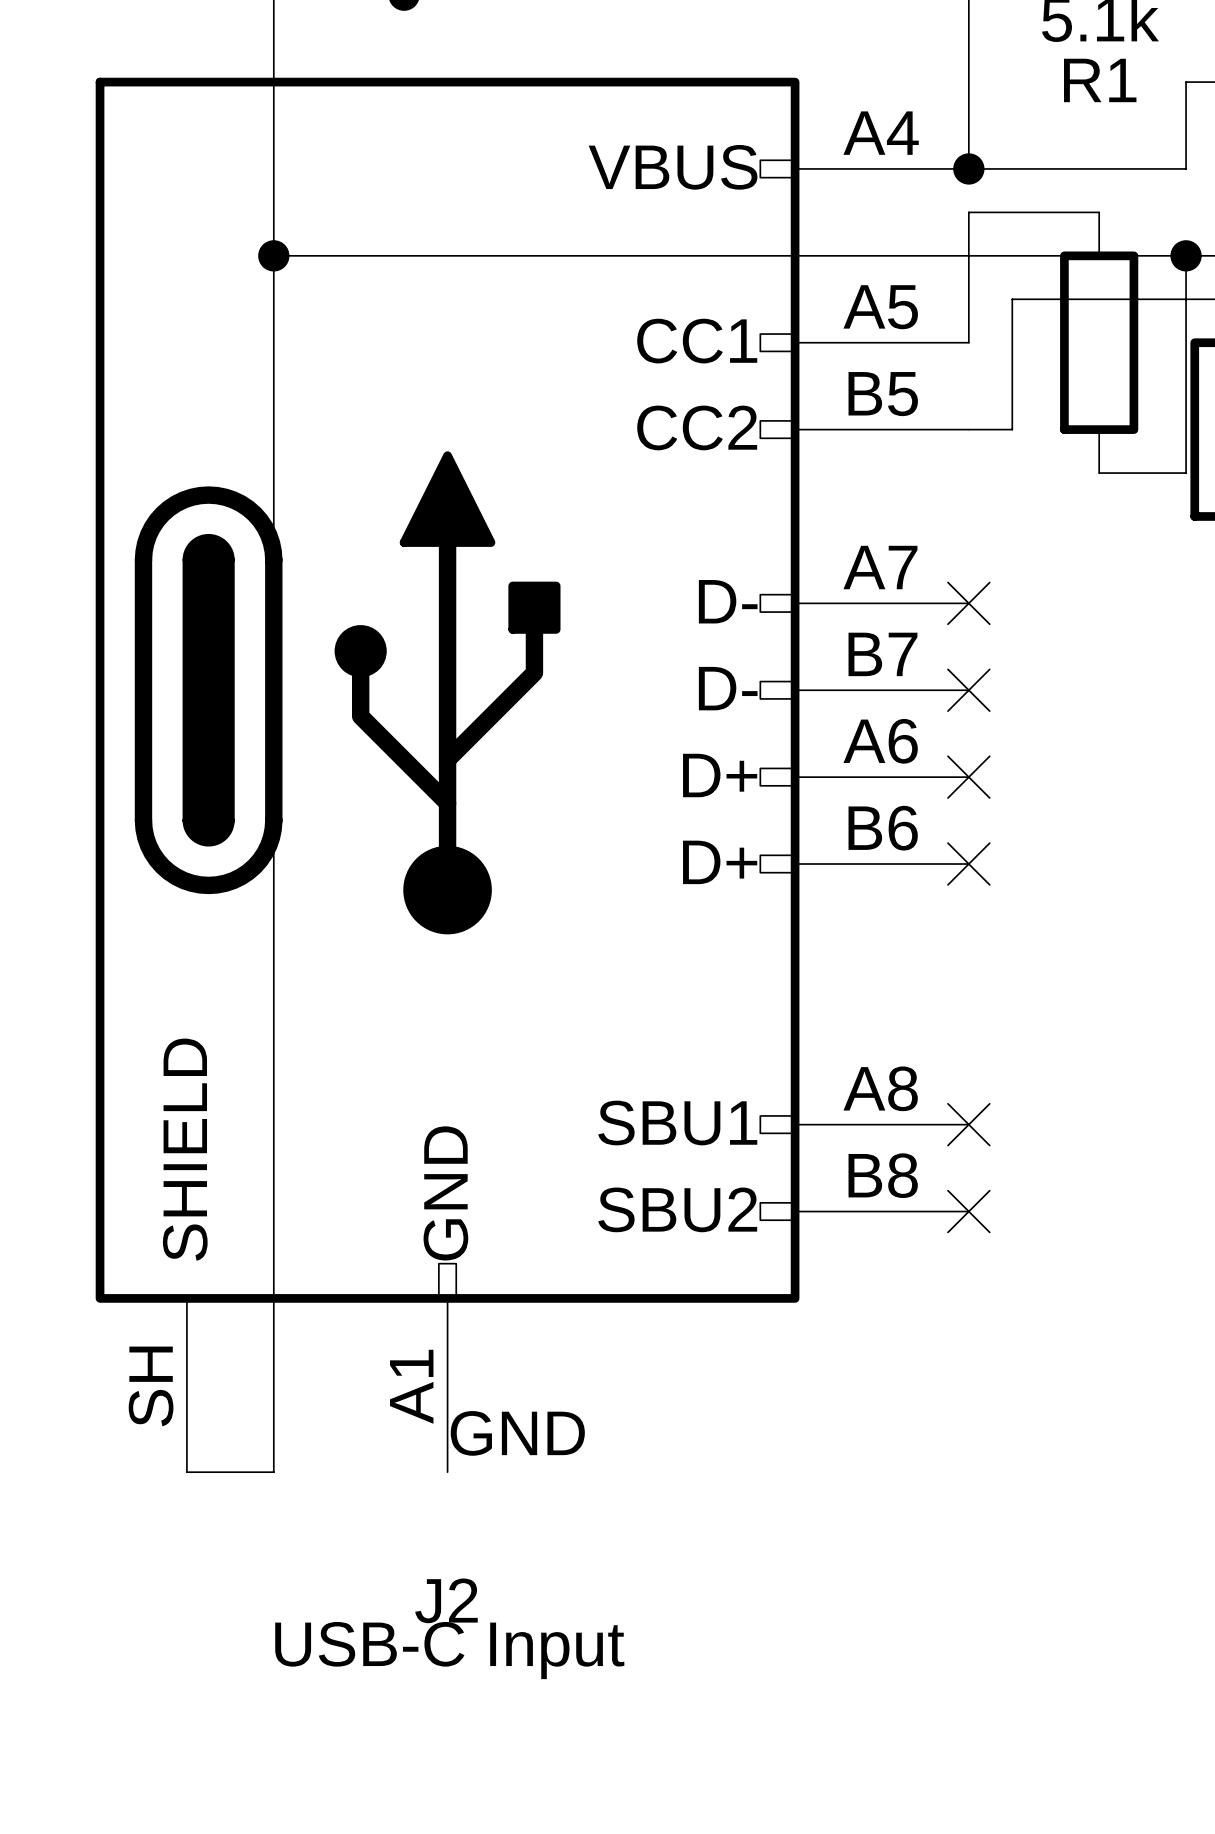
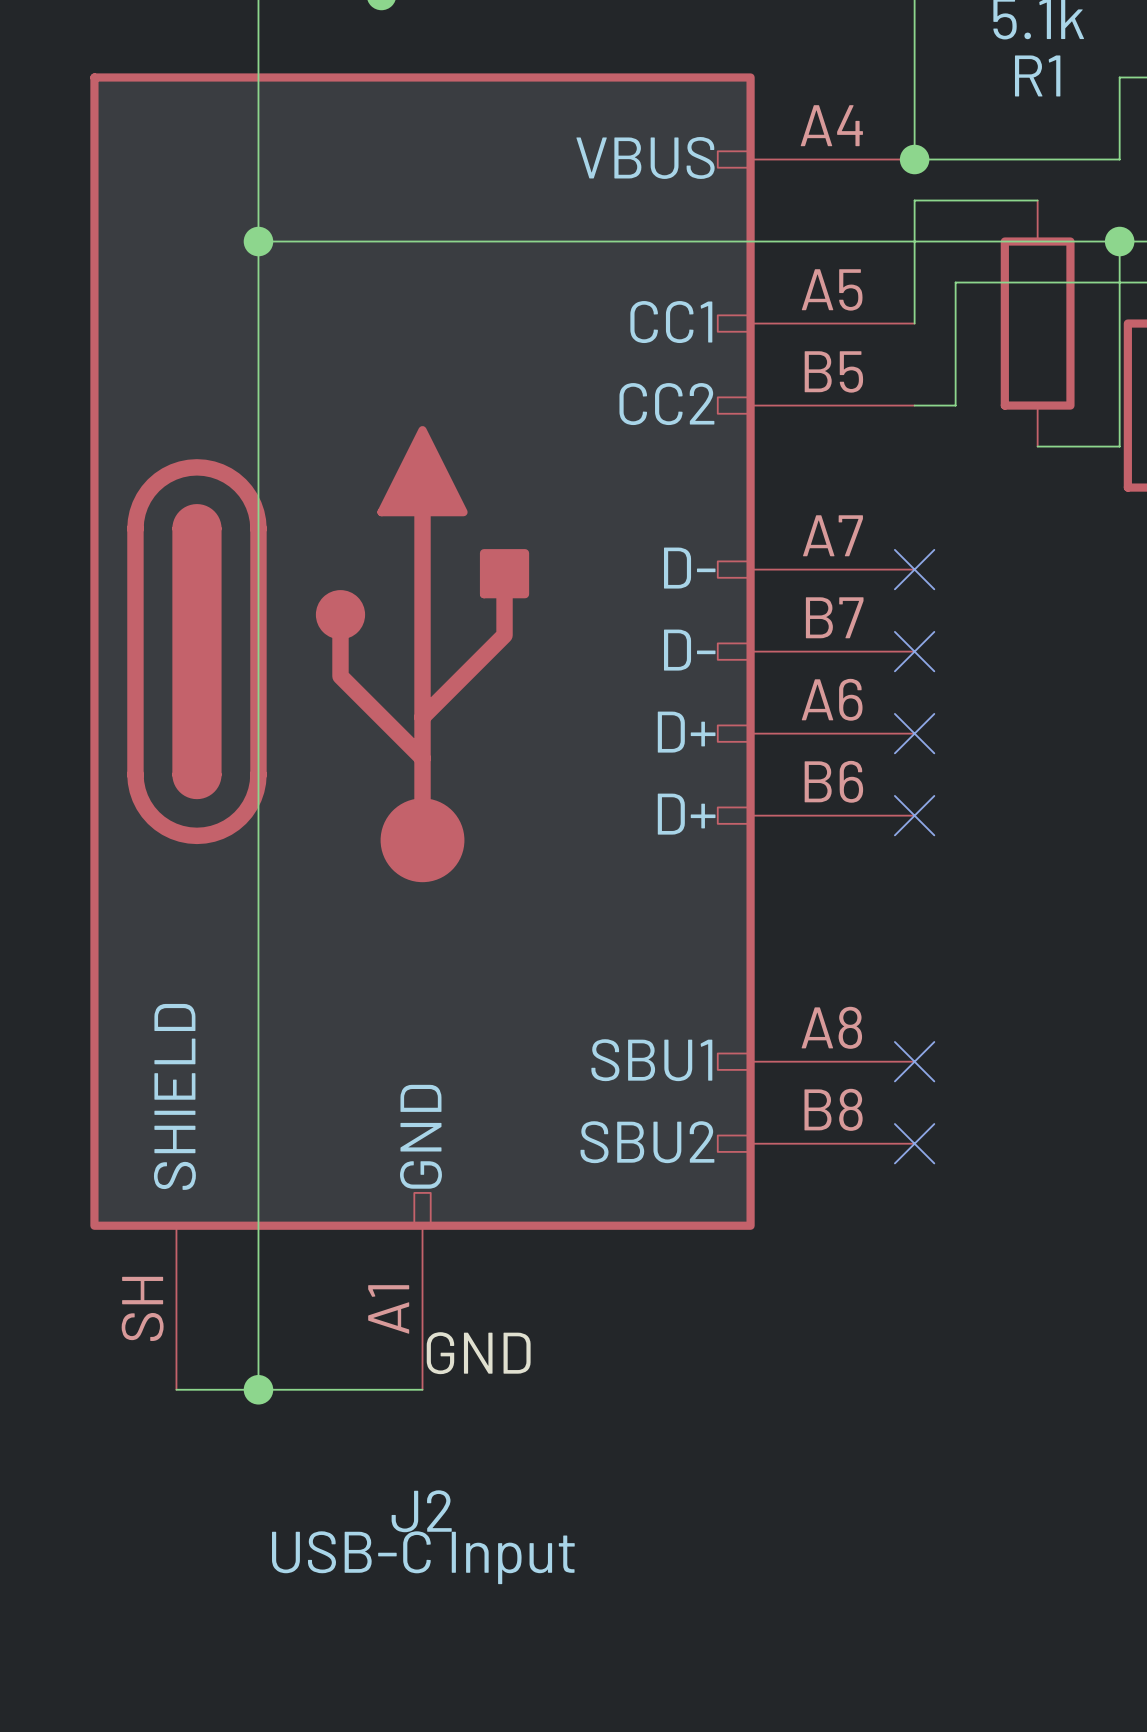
wire: none -> (258, 1389) (422, 1389)
junction: none -> (258, 1389)

